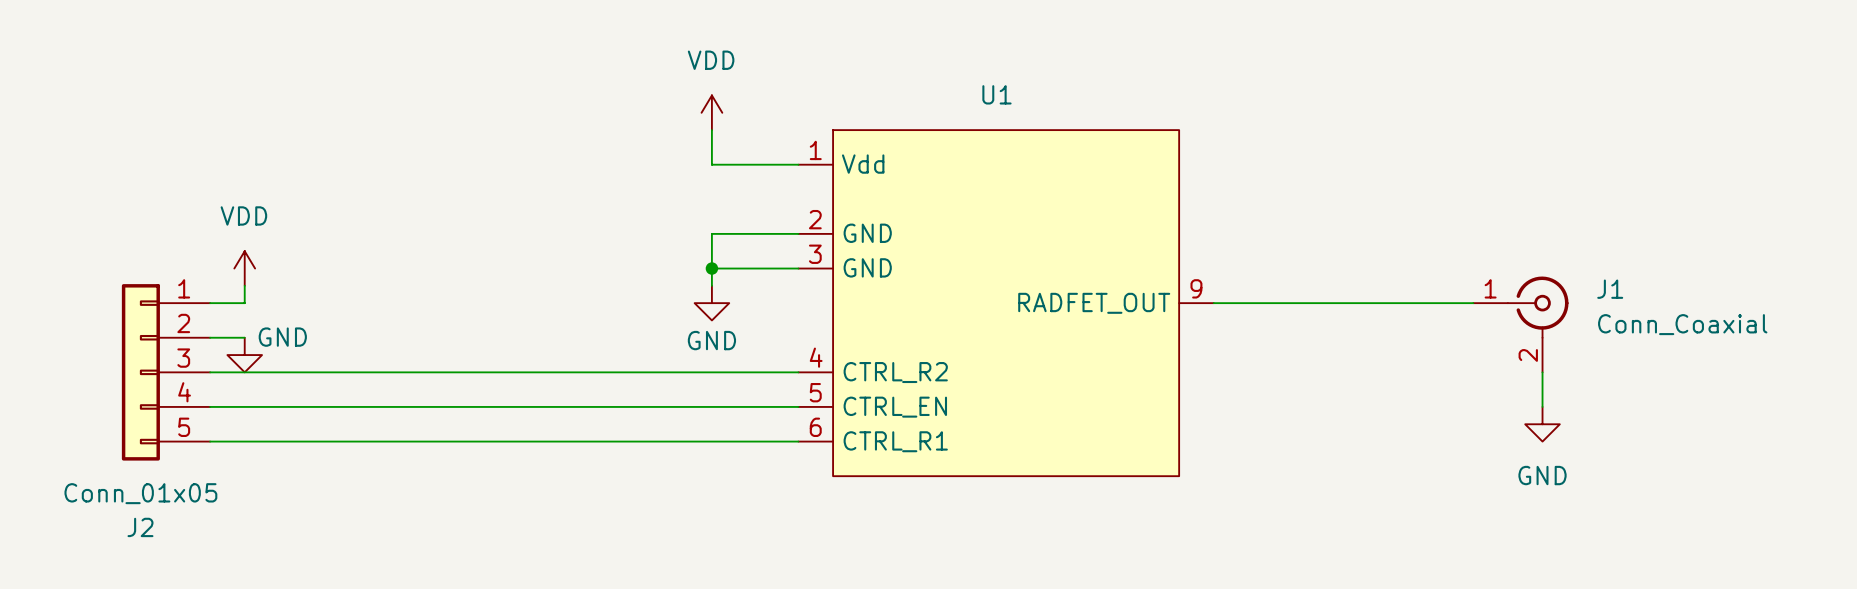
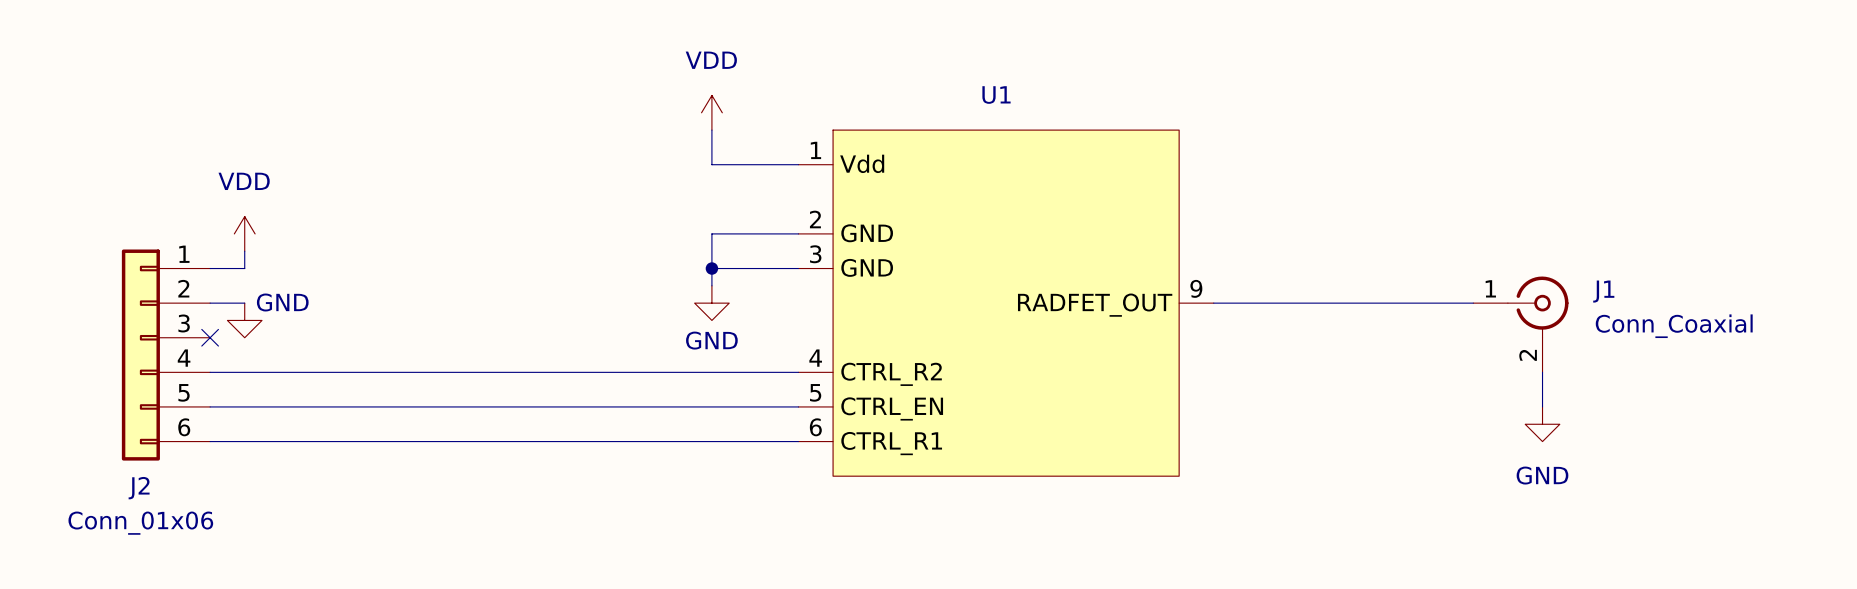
wire: none -> (244, 251) (244, 268) (210, 268)
power symbol position: VDD (244, 268) -> VDD (244, 233)
J2 symbol: [121, 284, 211, 461] -> [121, 249, 211, 461]
wire: (244, 285) (244, 303) -> none
wire: (210, 337) (244, 337) -> none
no-connect mark: none -> (210, 337)
power symbol position: GND (244, 355) -> GND (244, 320)
J2 value: Conn_01x05 (140, 493) -> Conn_01x06 (140, 523)

